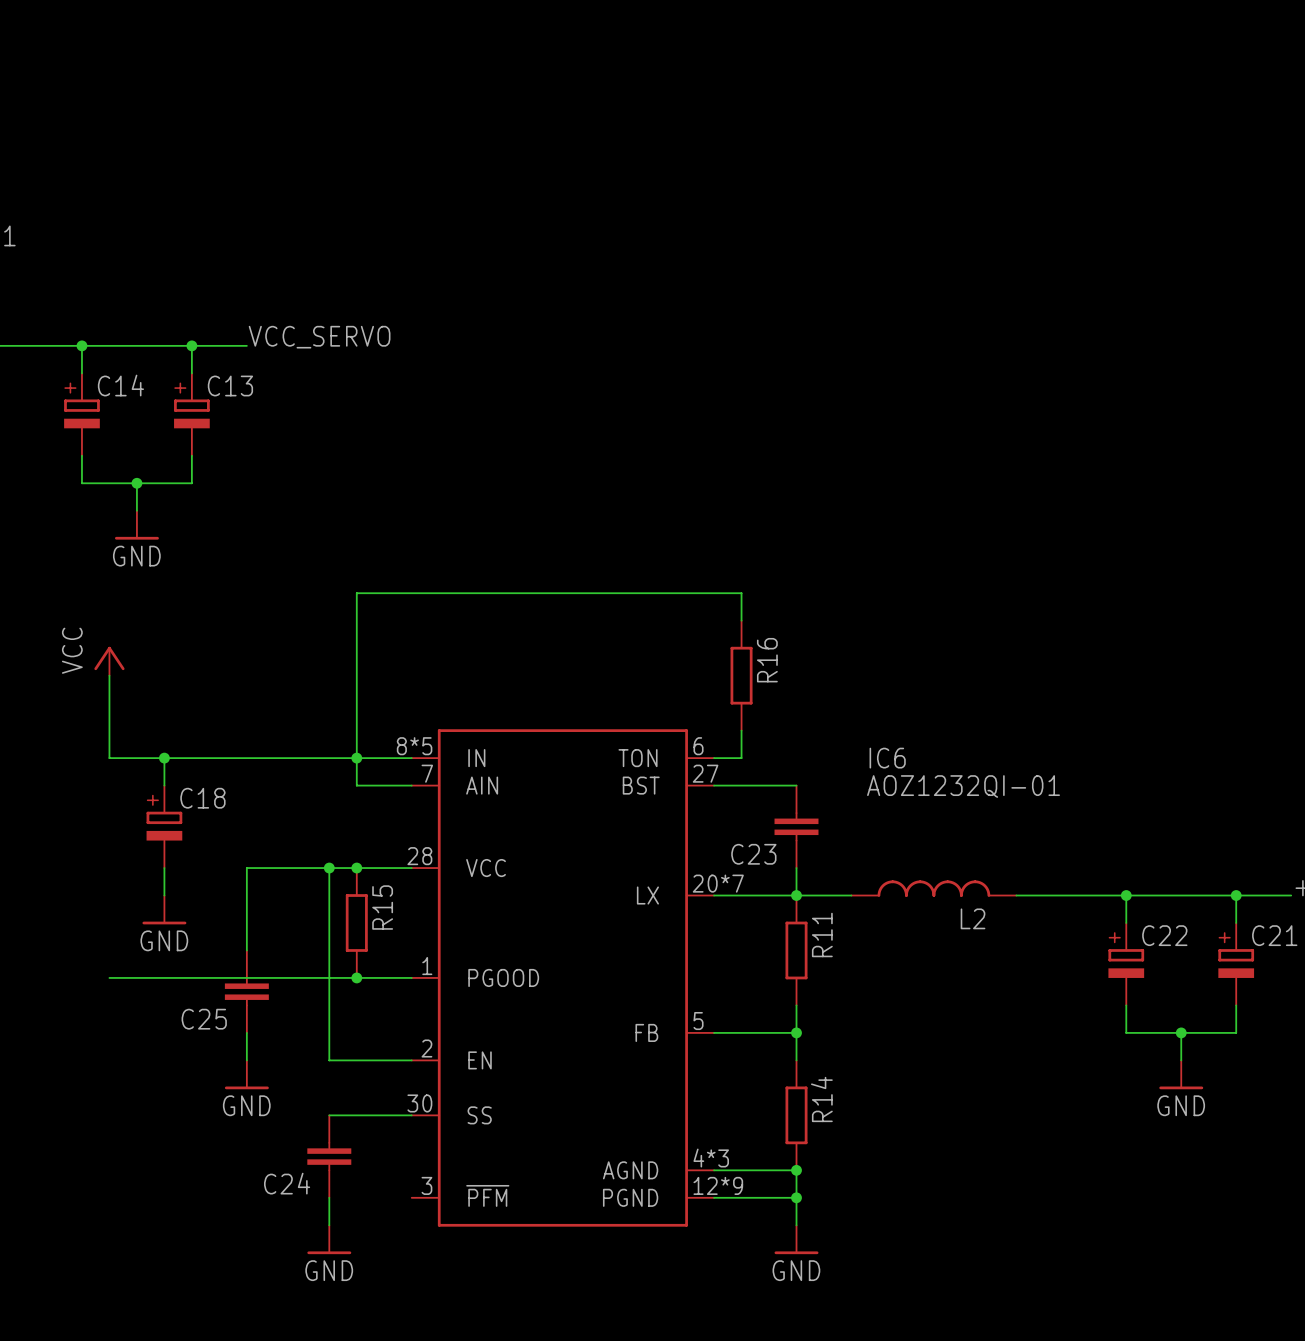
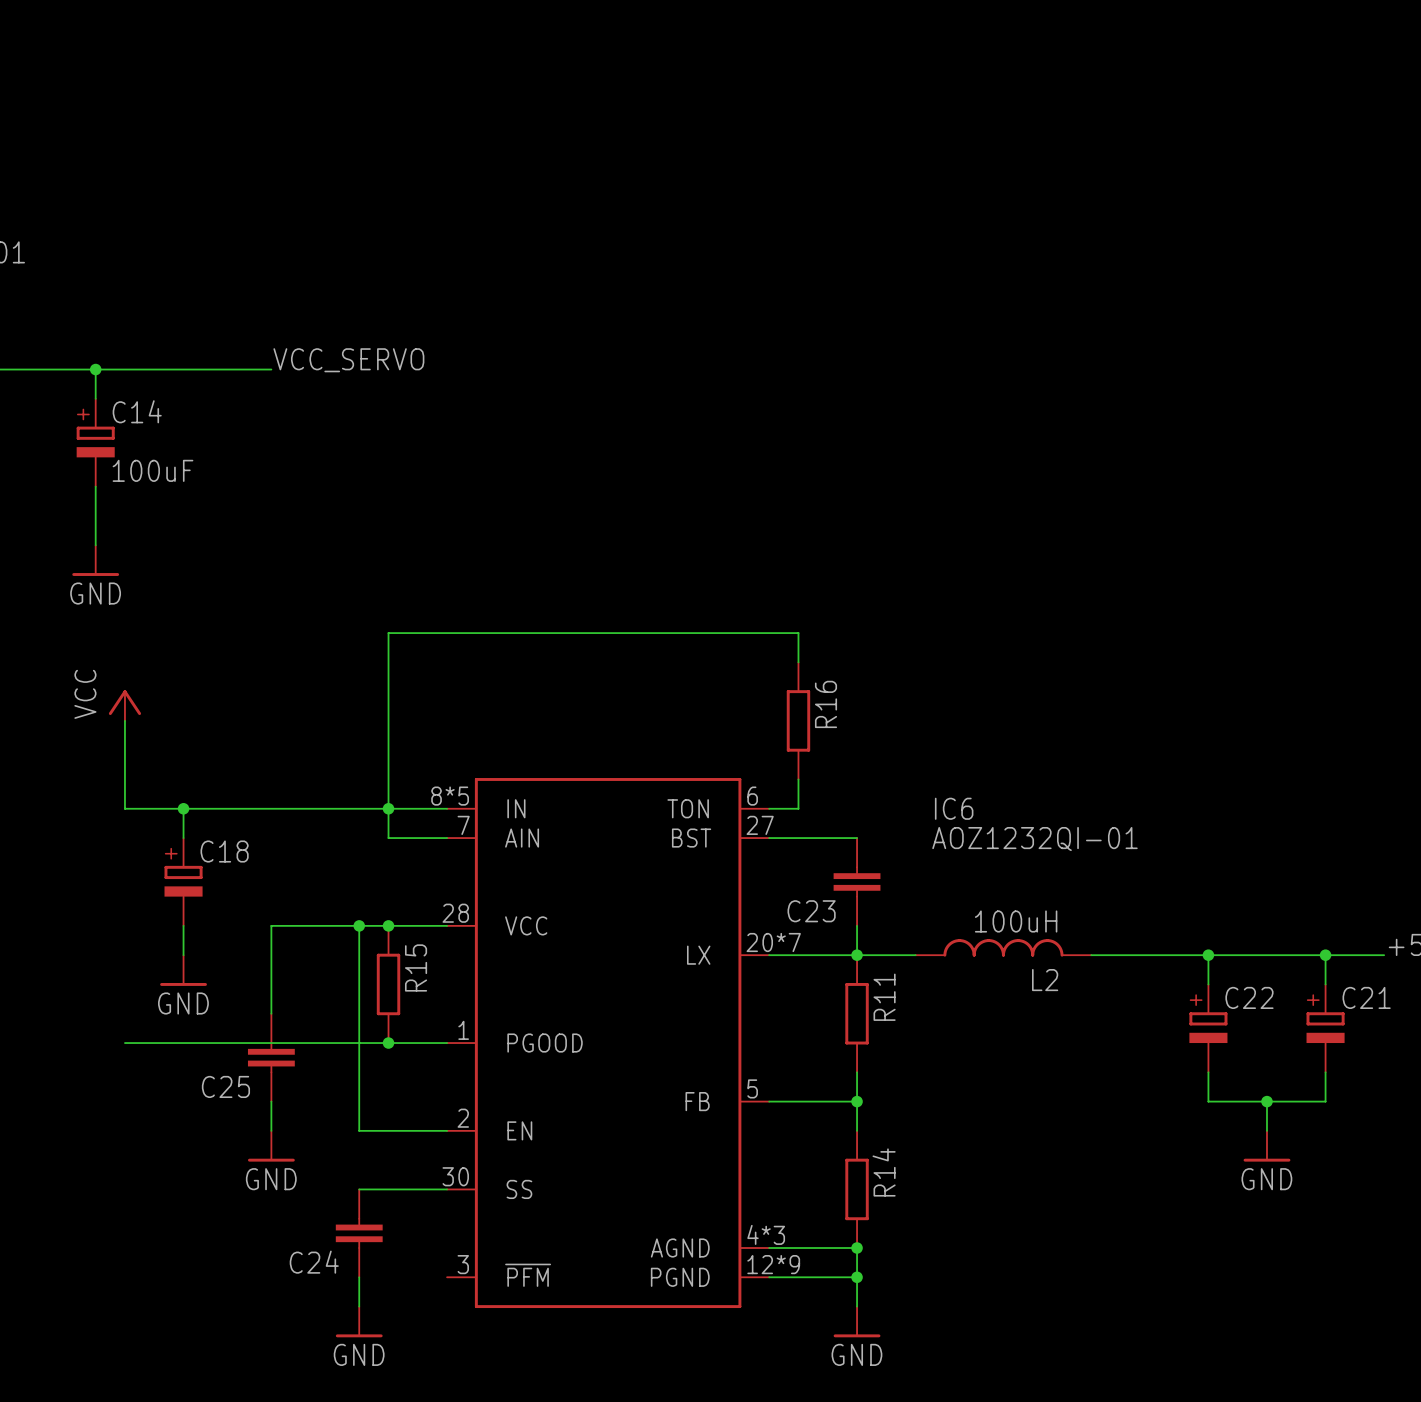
wire: (191, 345) (191, 373) -> none
junction: (191, 345) -> none
C13: (191, 414) -> none
C14 value: none -> 100uF (152, 470)
wire: (191, 455) (191, 483) (81, 483) -> (95, 545) (95, 515)
wire: (136, 483) (136, 510) -> none
junction: (136, 483) -> none
power symbol position: GND (136, 525) -> GND (95, 560)
L2 value: none -> 100uH (1016, 921)

